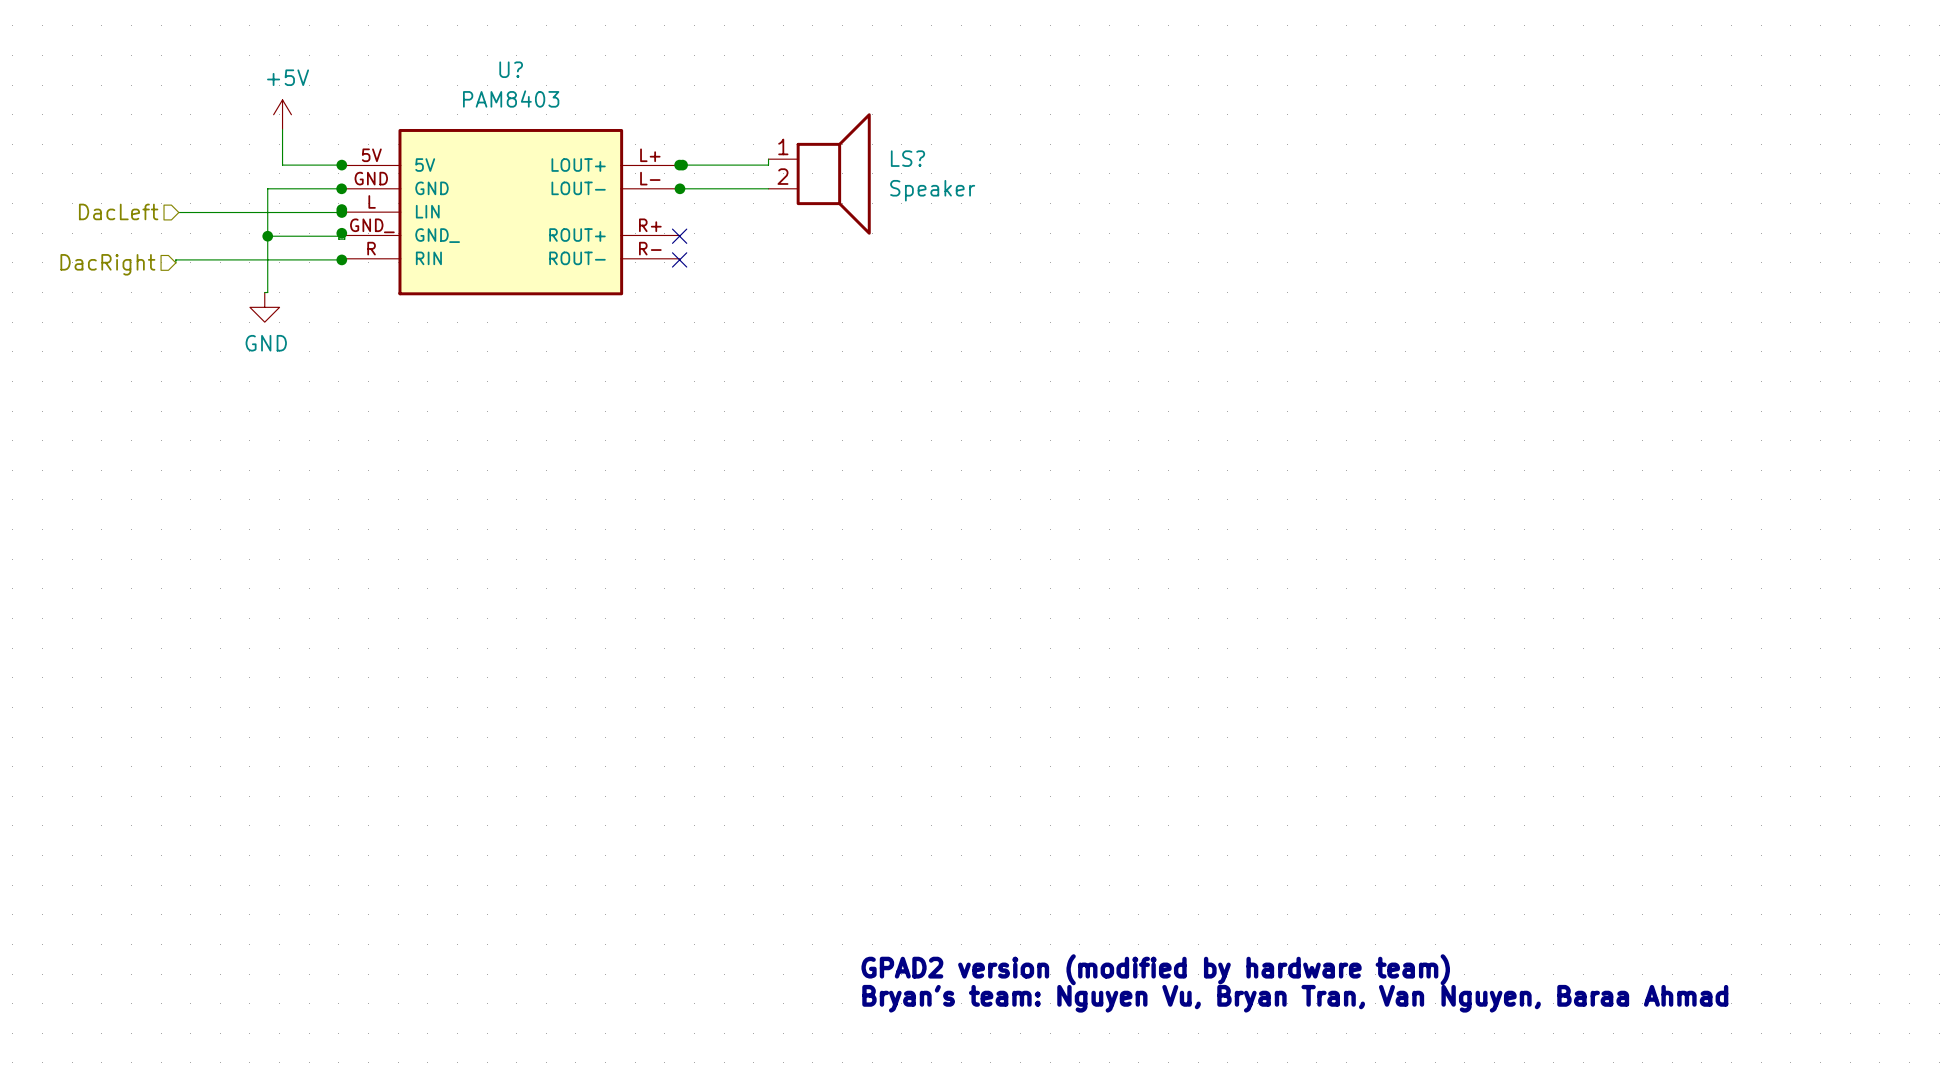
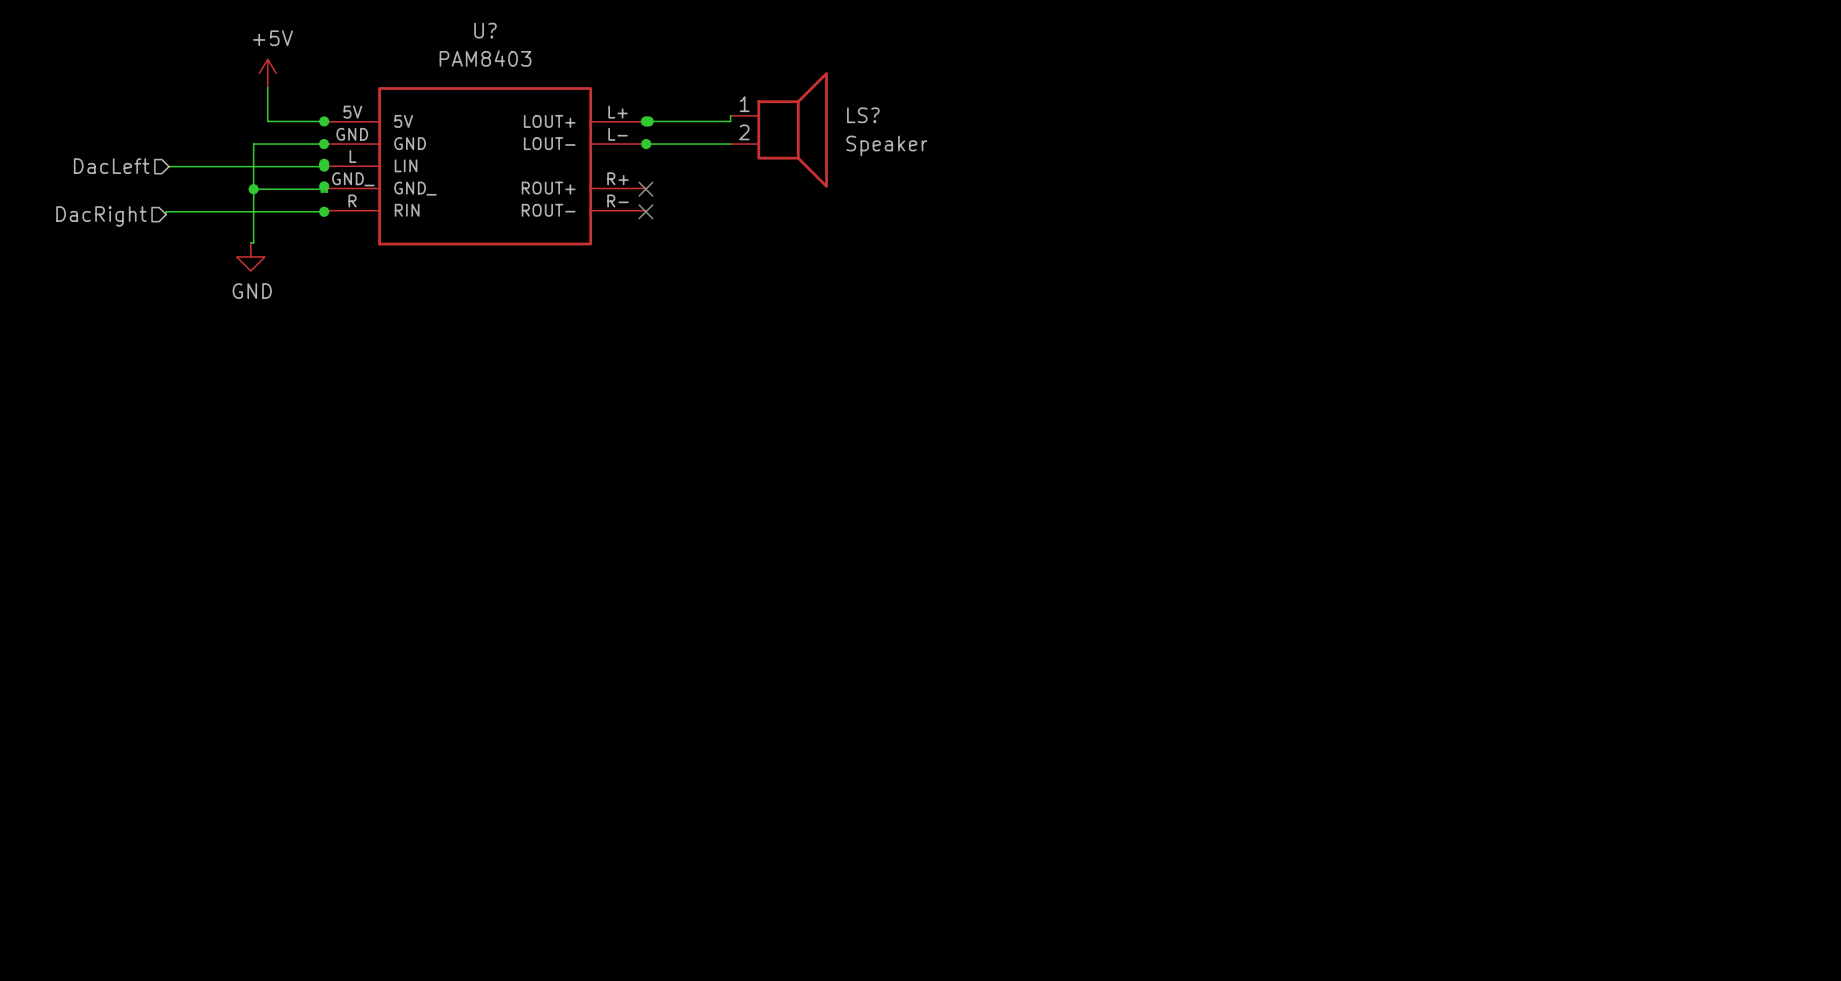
text: GPAD2 version (modified by hardware team) (1155, 969) -> none
text: Bryan's team: Nguyen Vu, Bryan Tran, Van Nguyen, Baraa Ahmad (1295, 998) -> none

